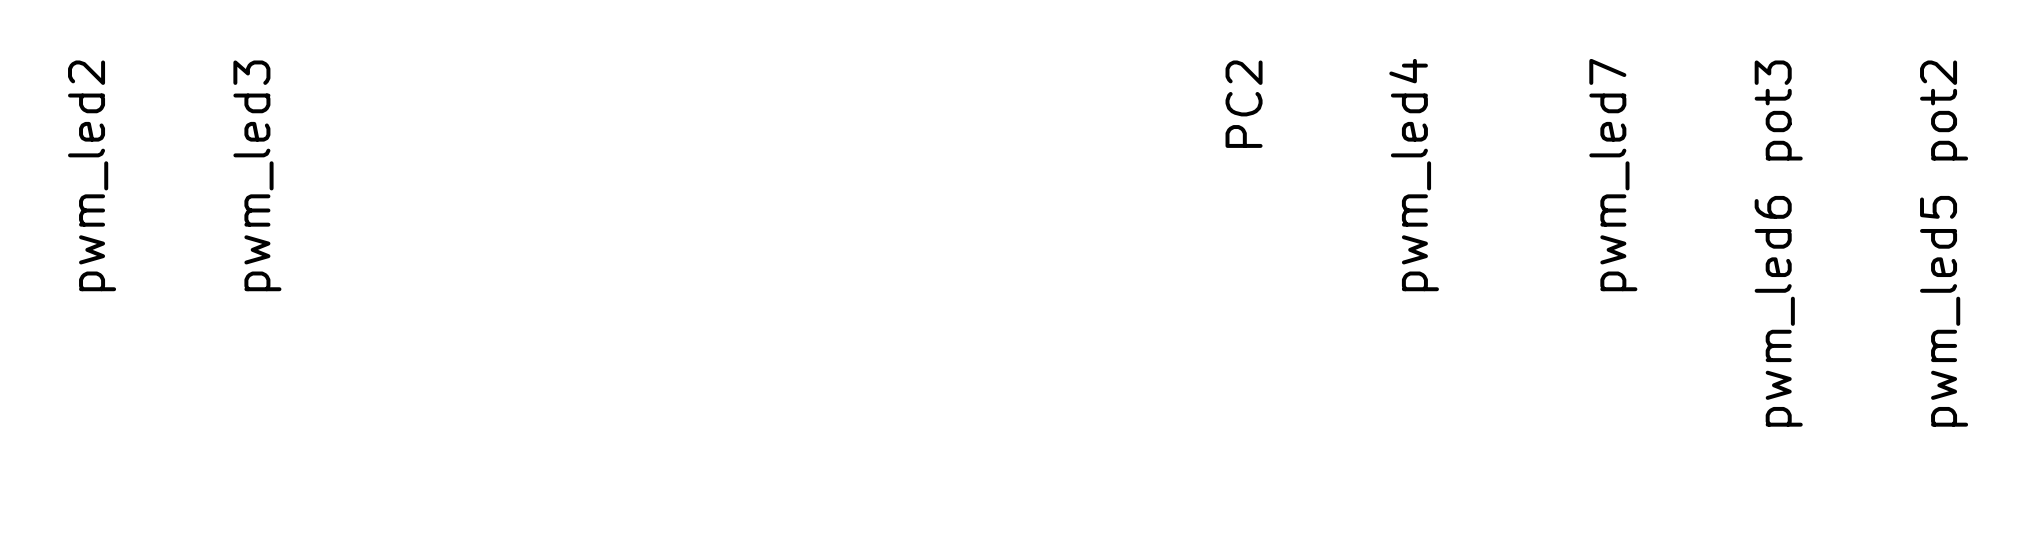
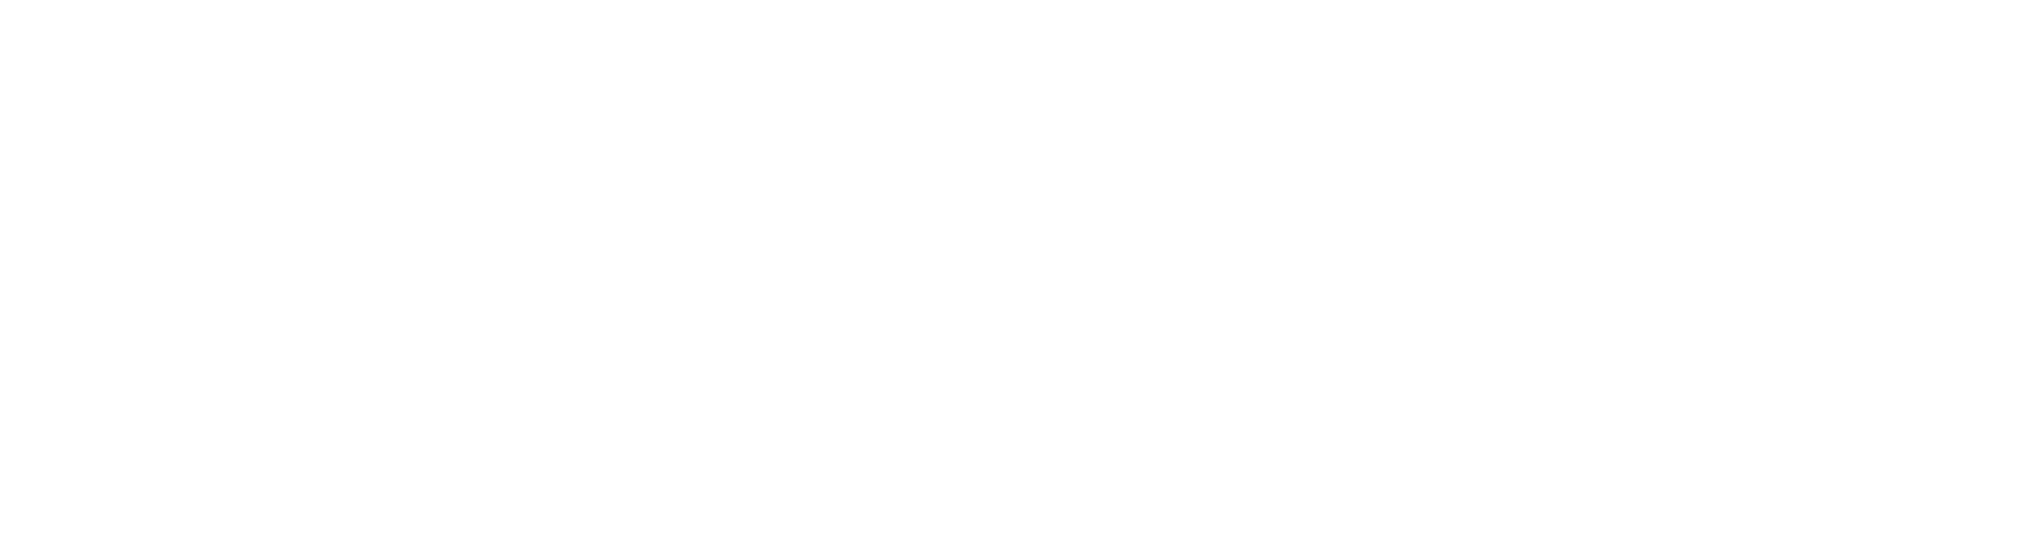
label: PC2 (1244, 104) -> none
label: pwm_led2 (92, 175) -> none
label: pwm_led3 (257, 175) -> none
label: pwm_led4 (1414, 175) -> none
label: pwm_led7 (1613, 175) -> none
label: pwm_led6 pot3 (1778, 243) -> none
label: pwm_led5 pot2 (1944, 243) -> none

